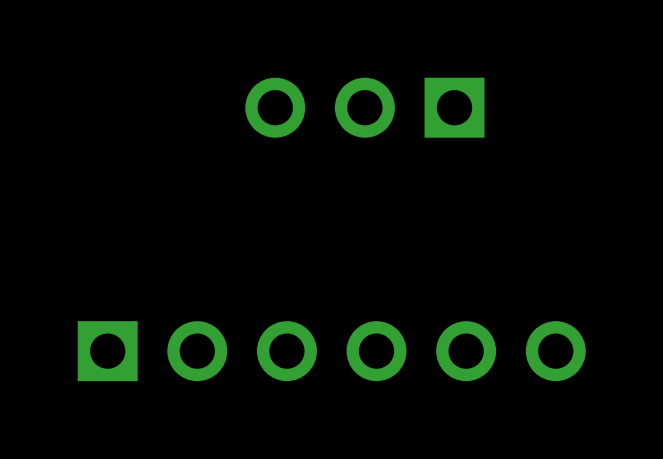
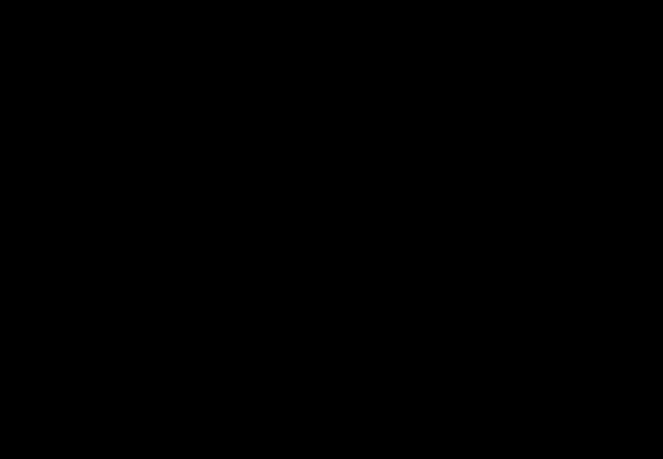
part: (364, 107) -> none
part: (331, 351) -> none

